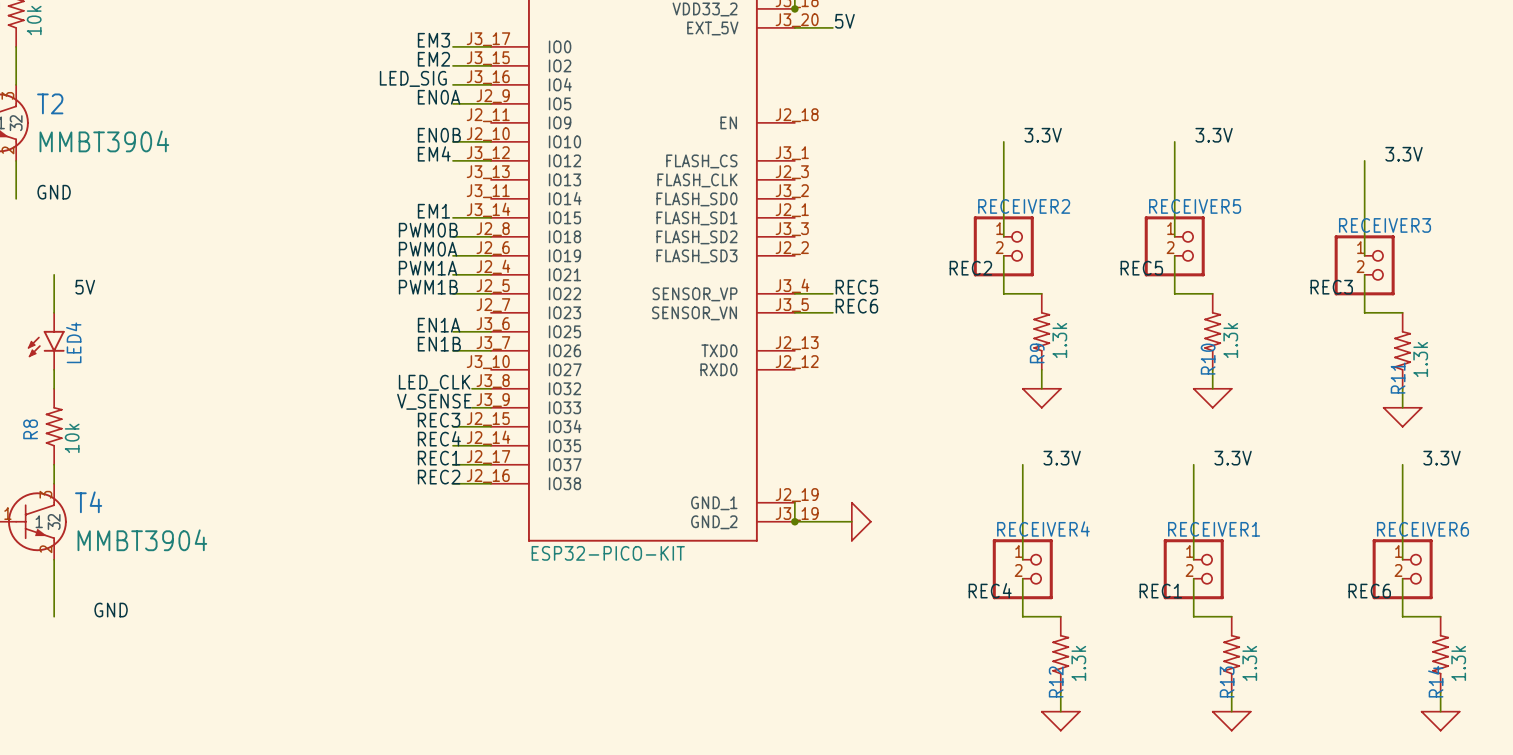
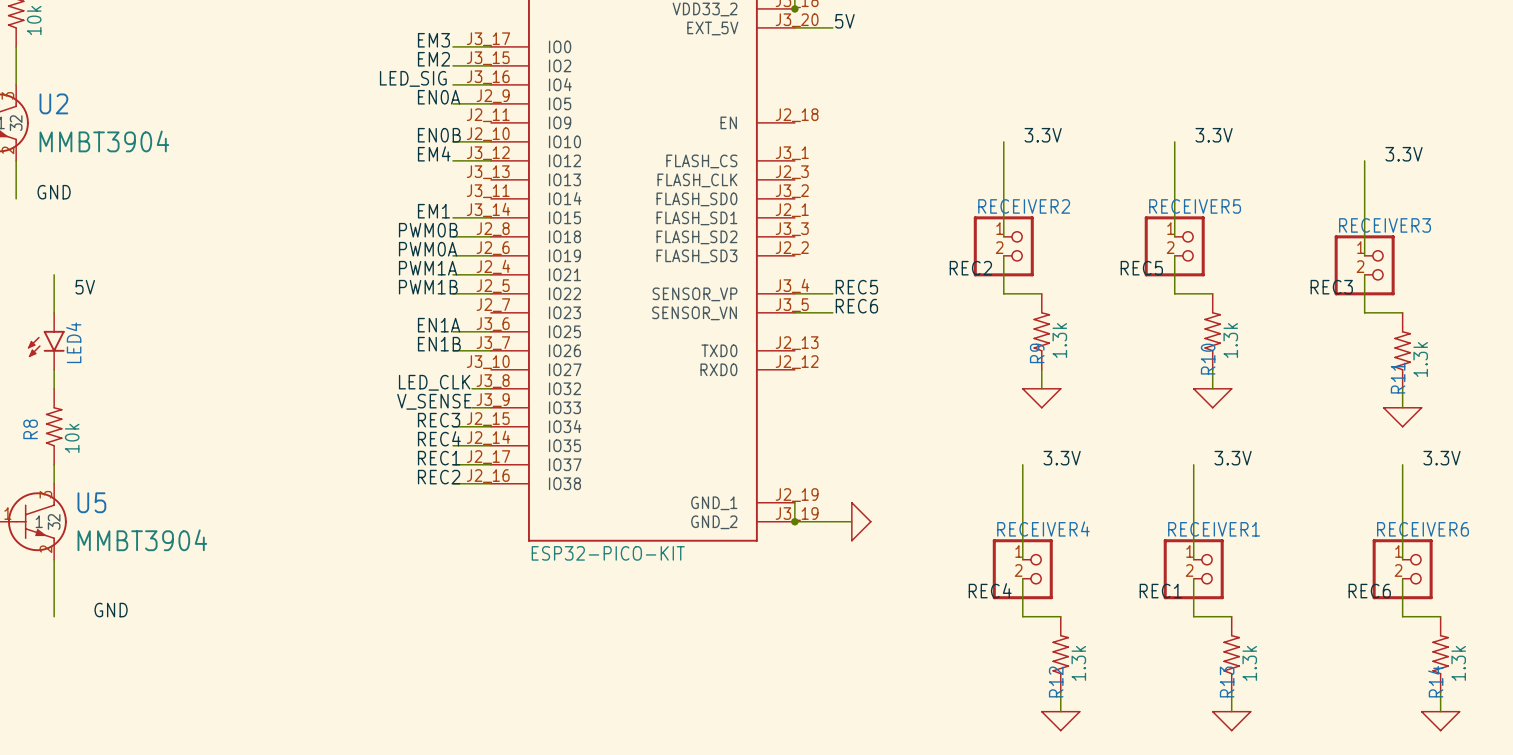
T2 name: T2 (50, 103) -> U2 (53, 103)
T4 name: T4 (88, 502) -> U5 (91, 502)

